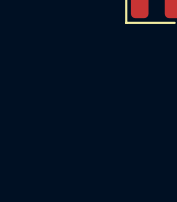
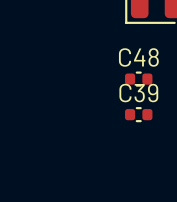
C48: none -> (138, 79)
C39: none -> (138, 114)

